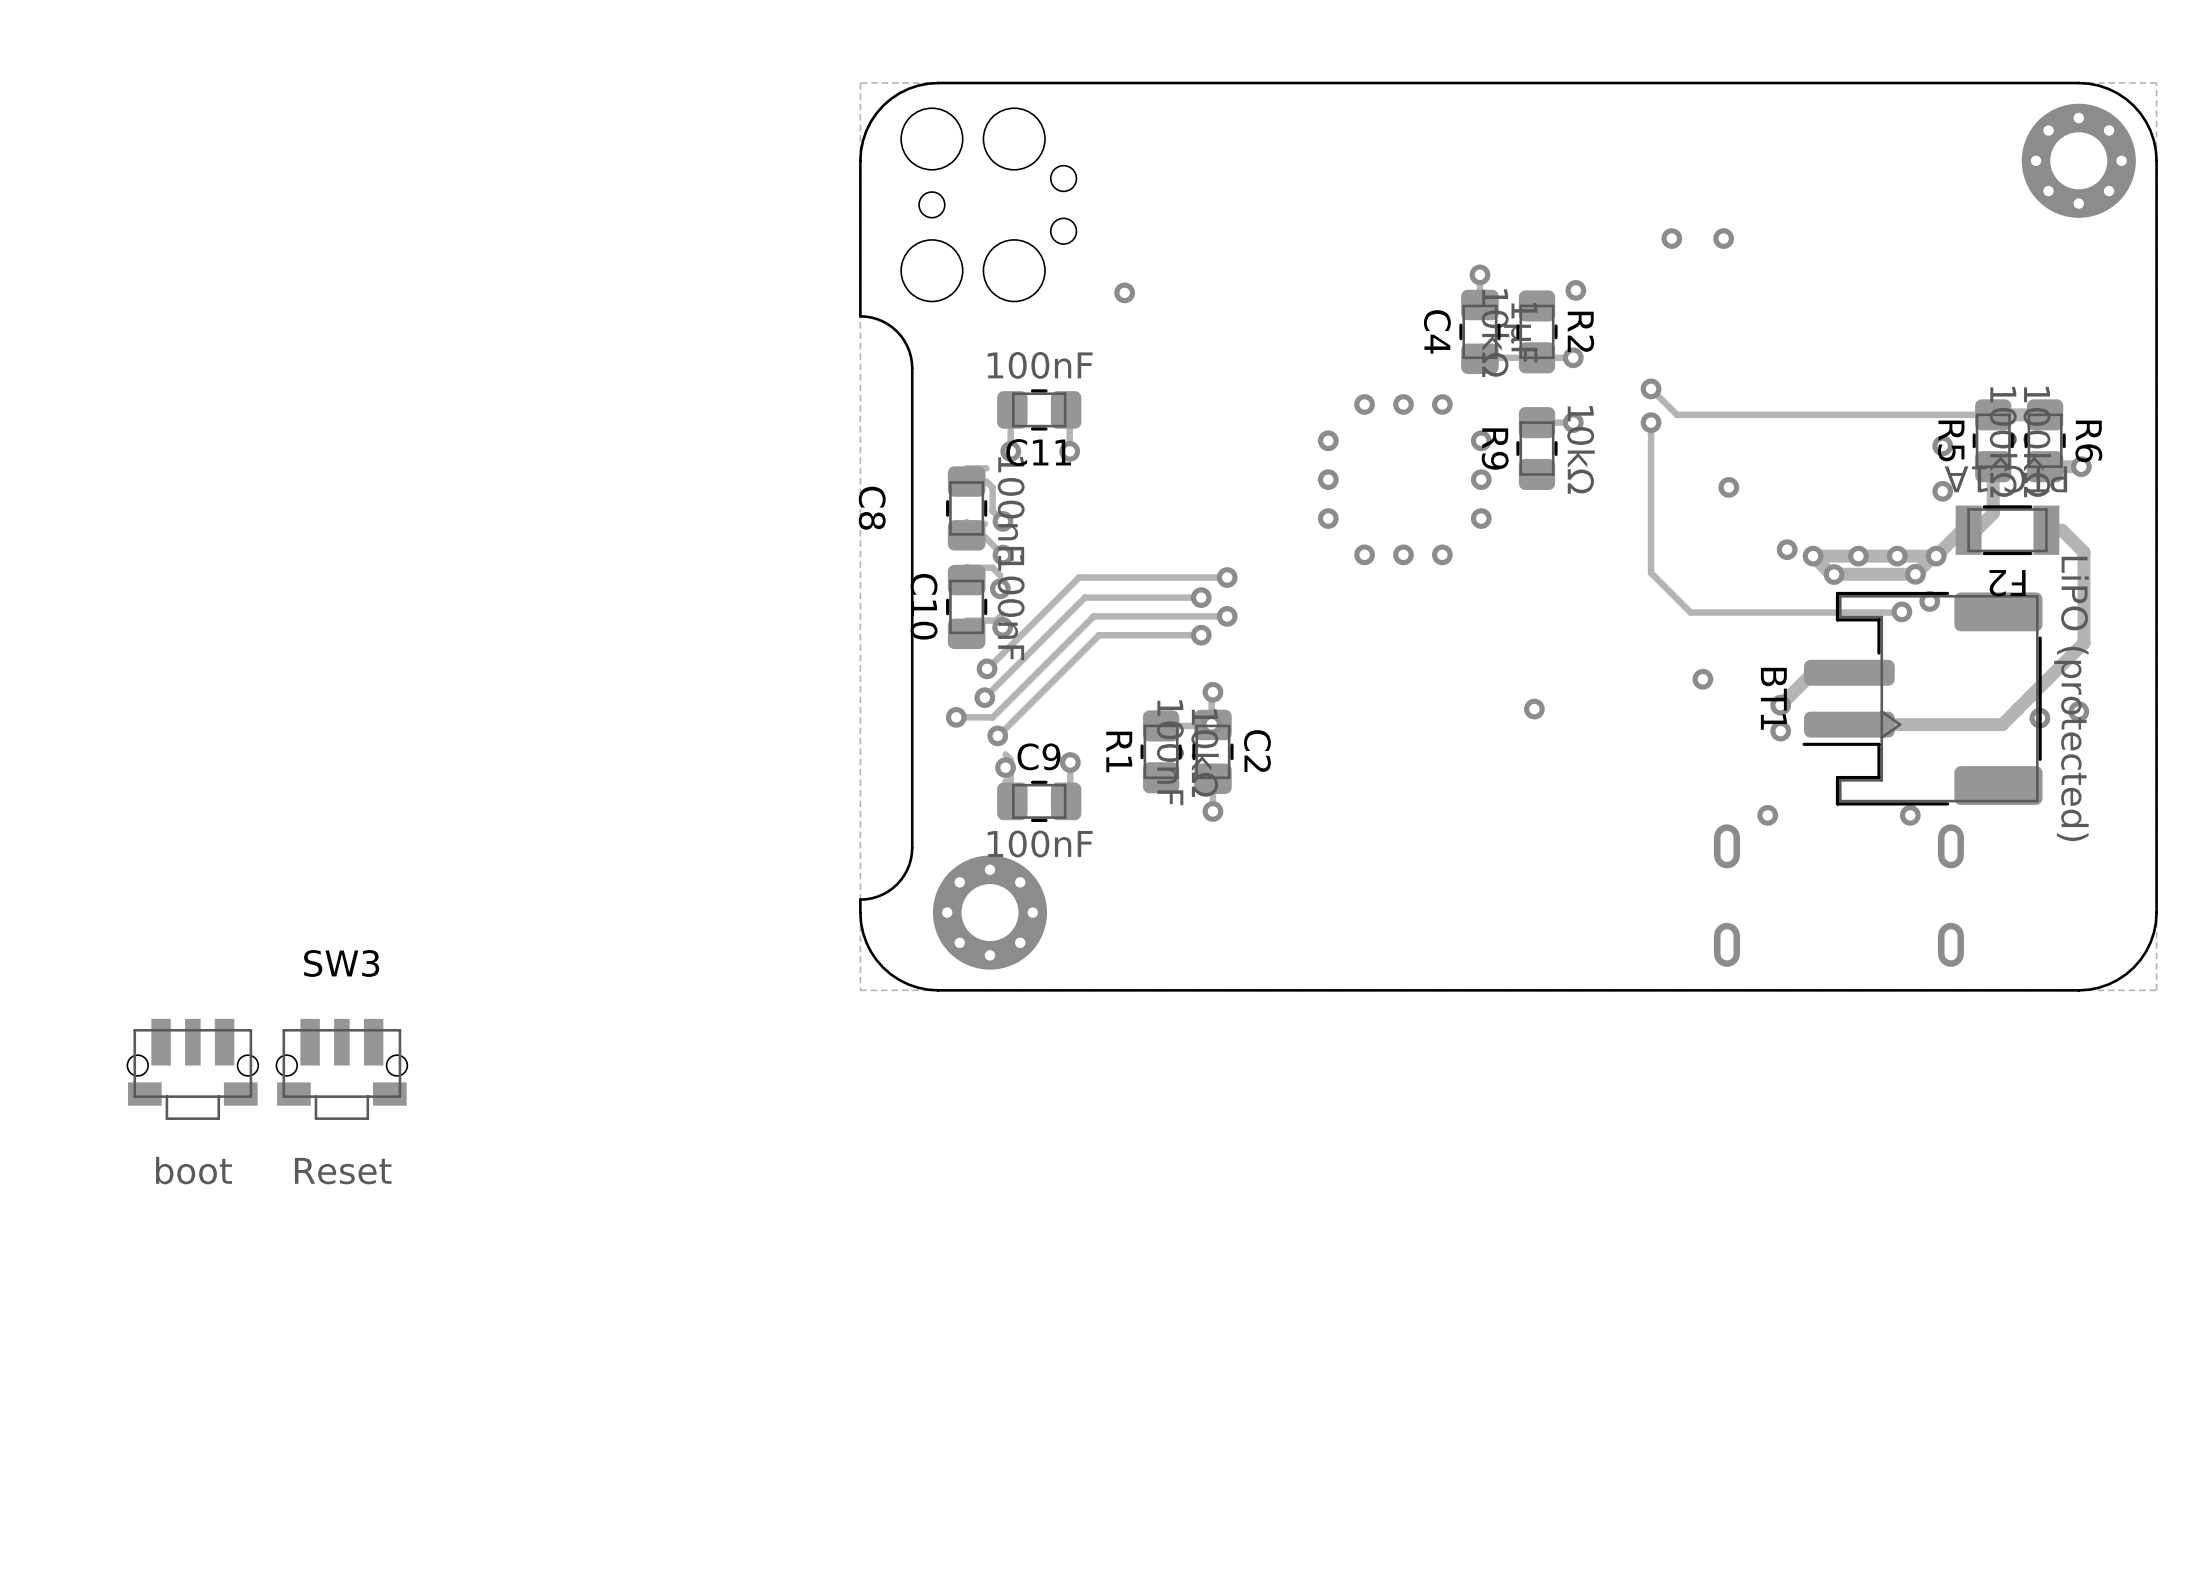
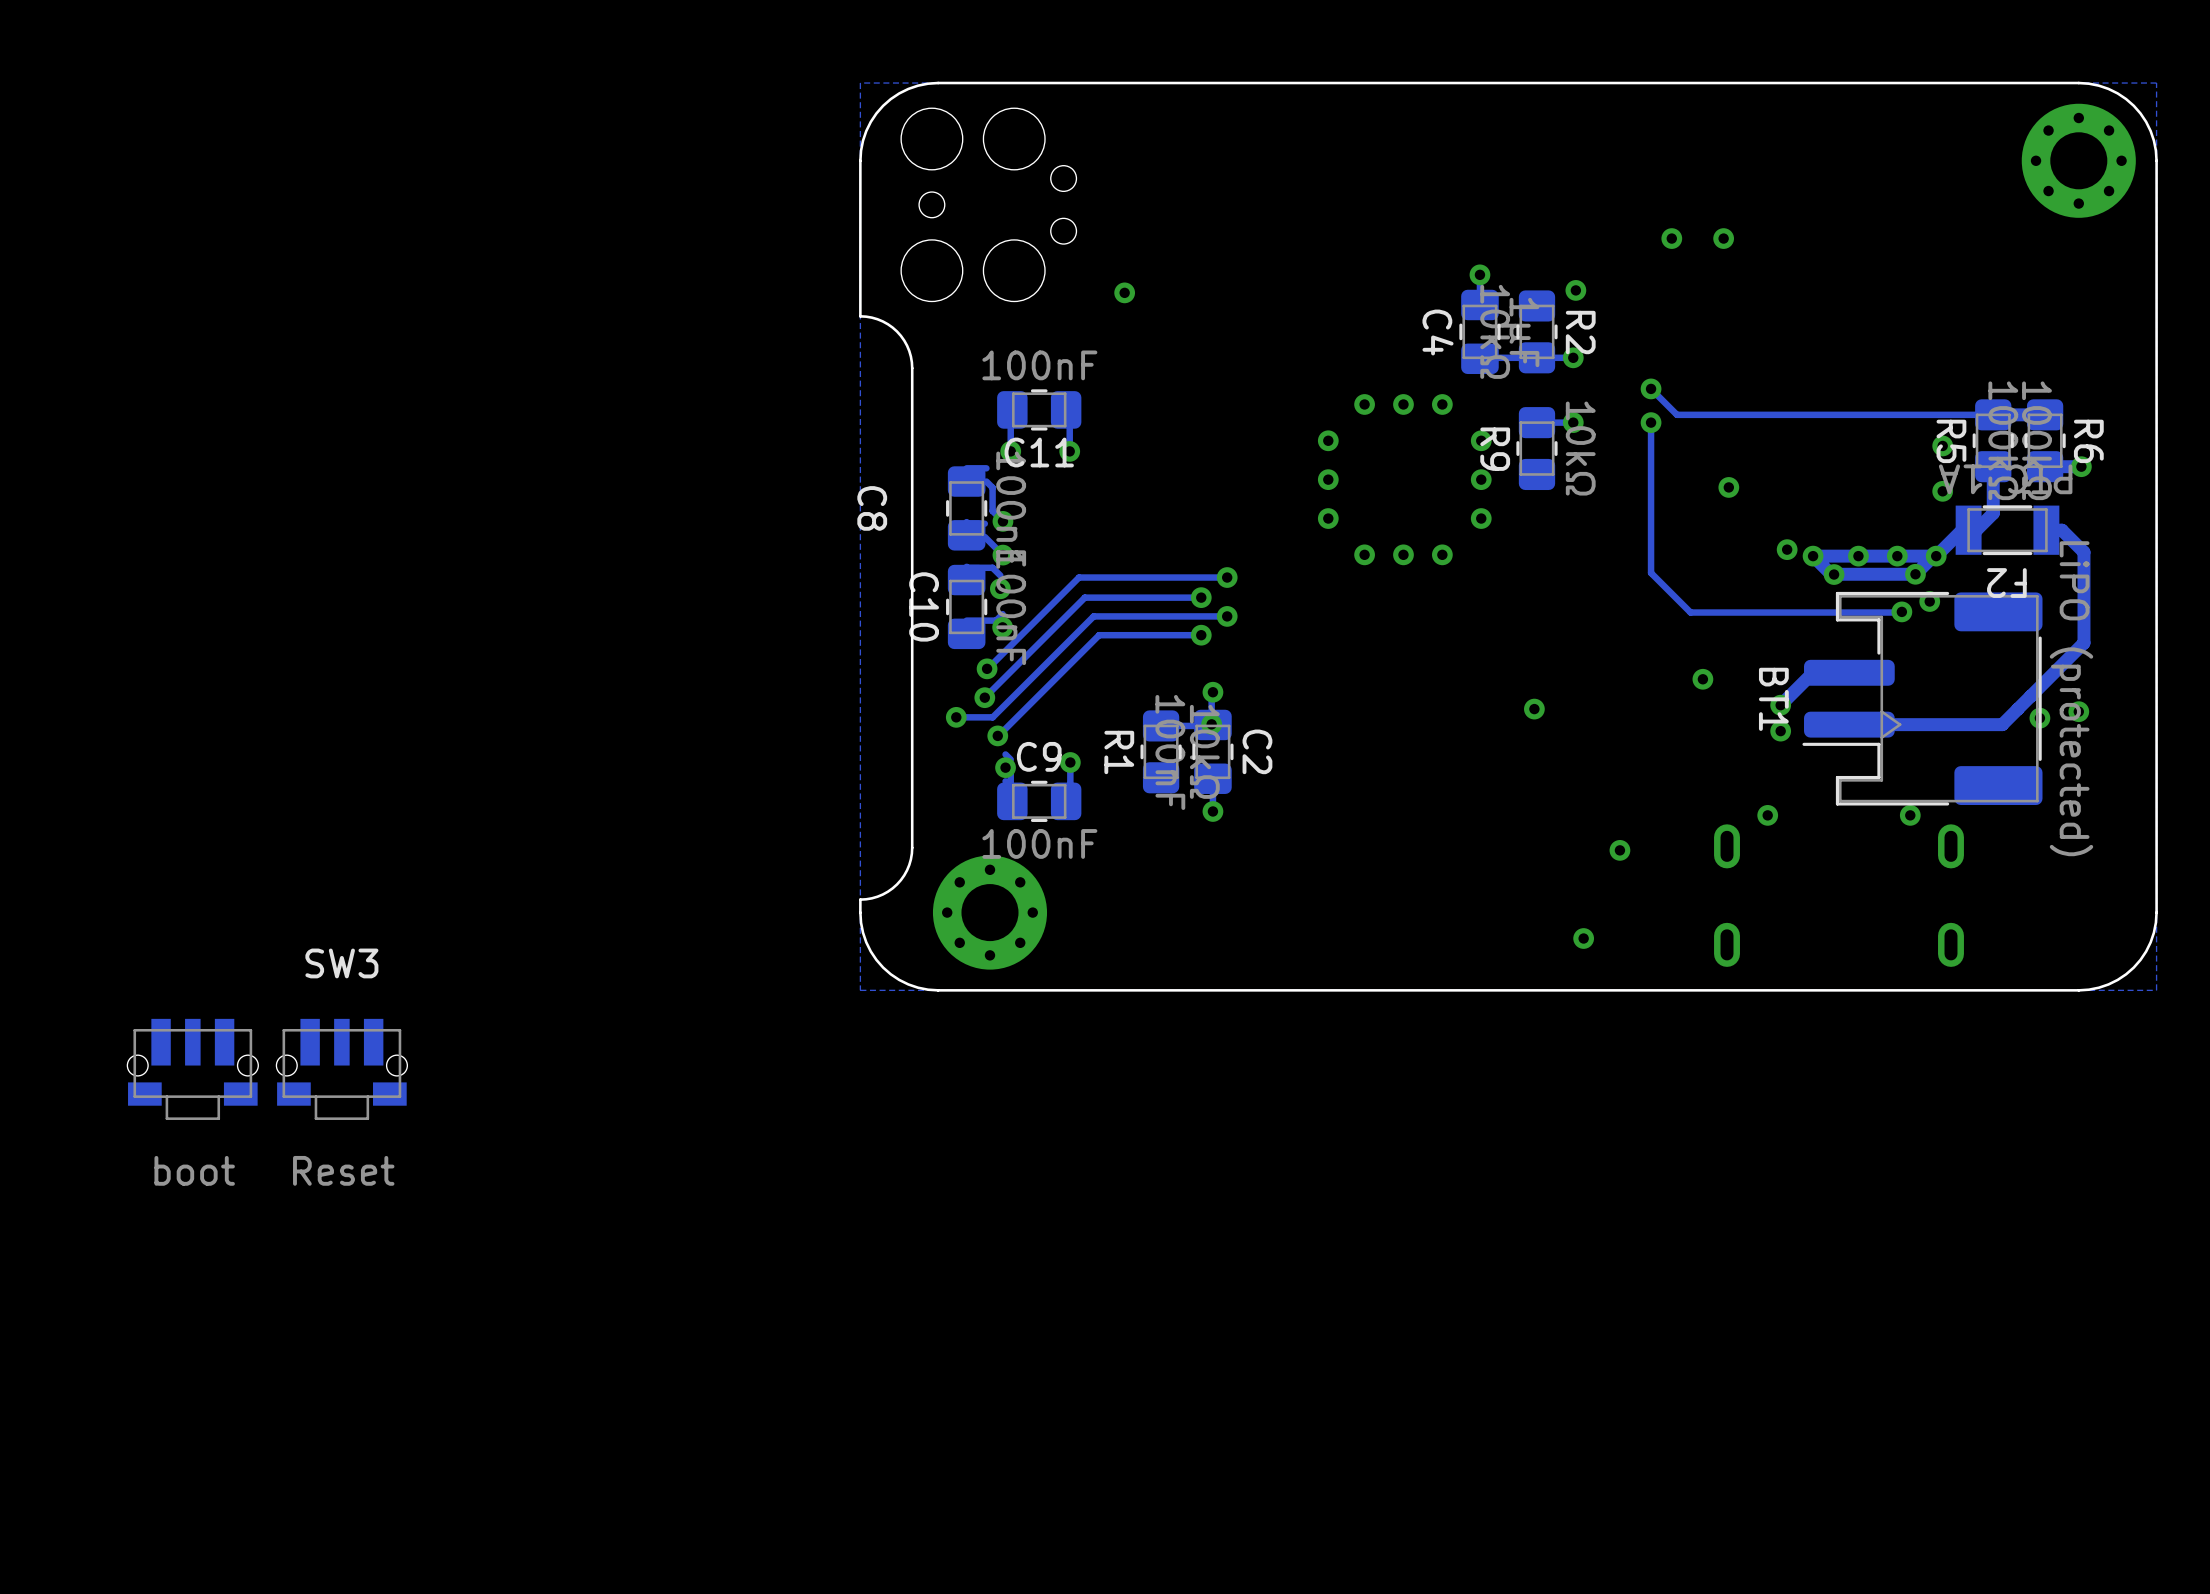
via: none -> (1619, 850)
via: none -> (1583, 938)

